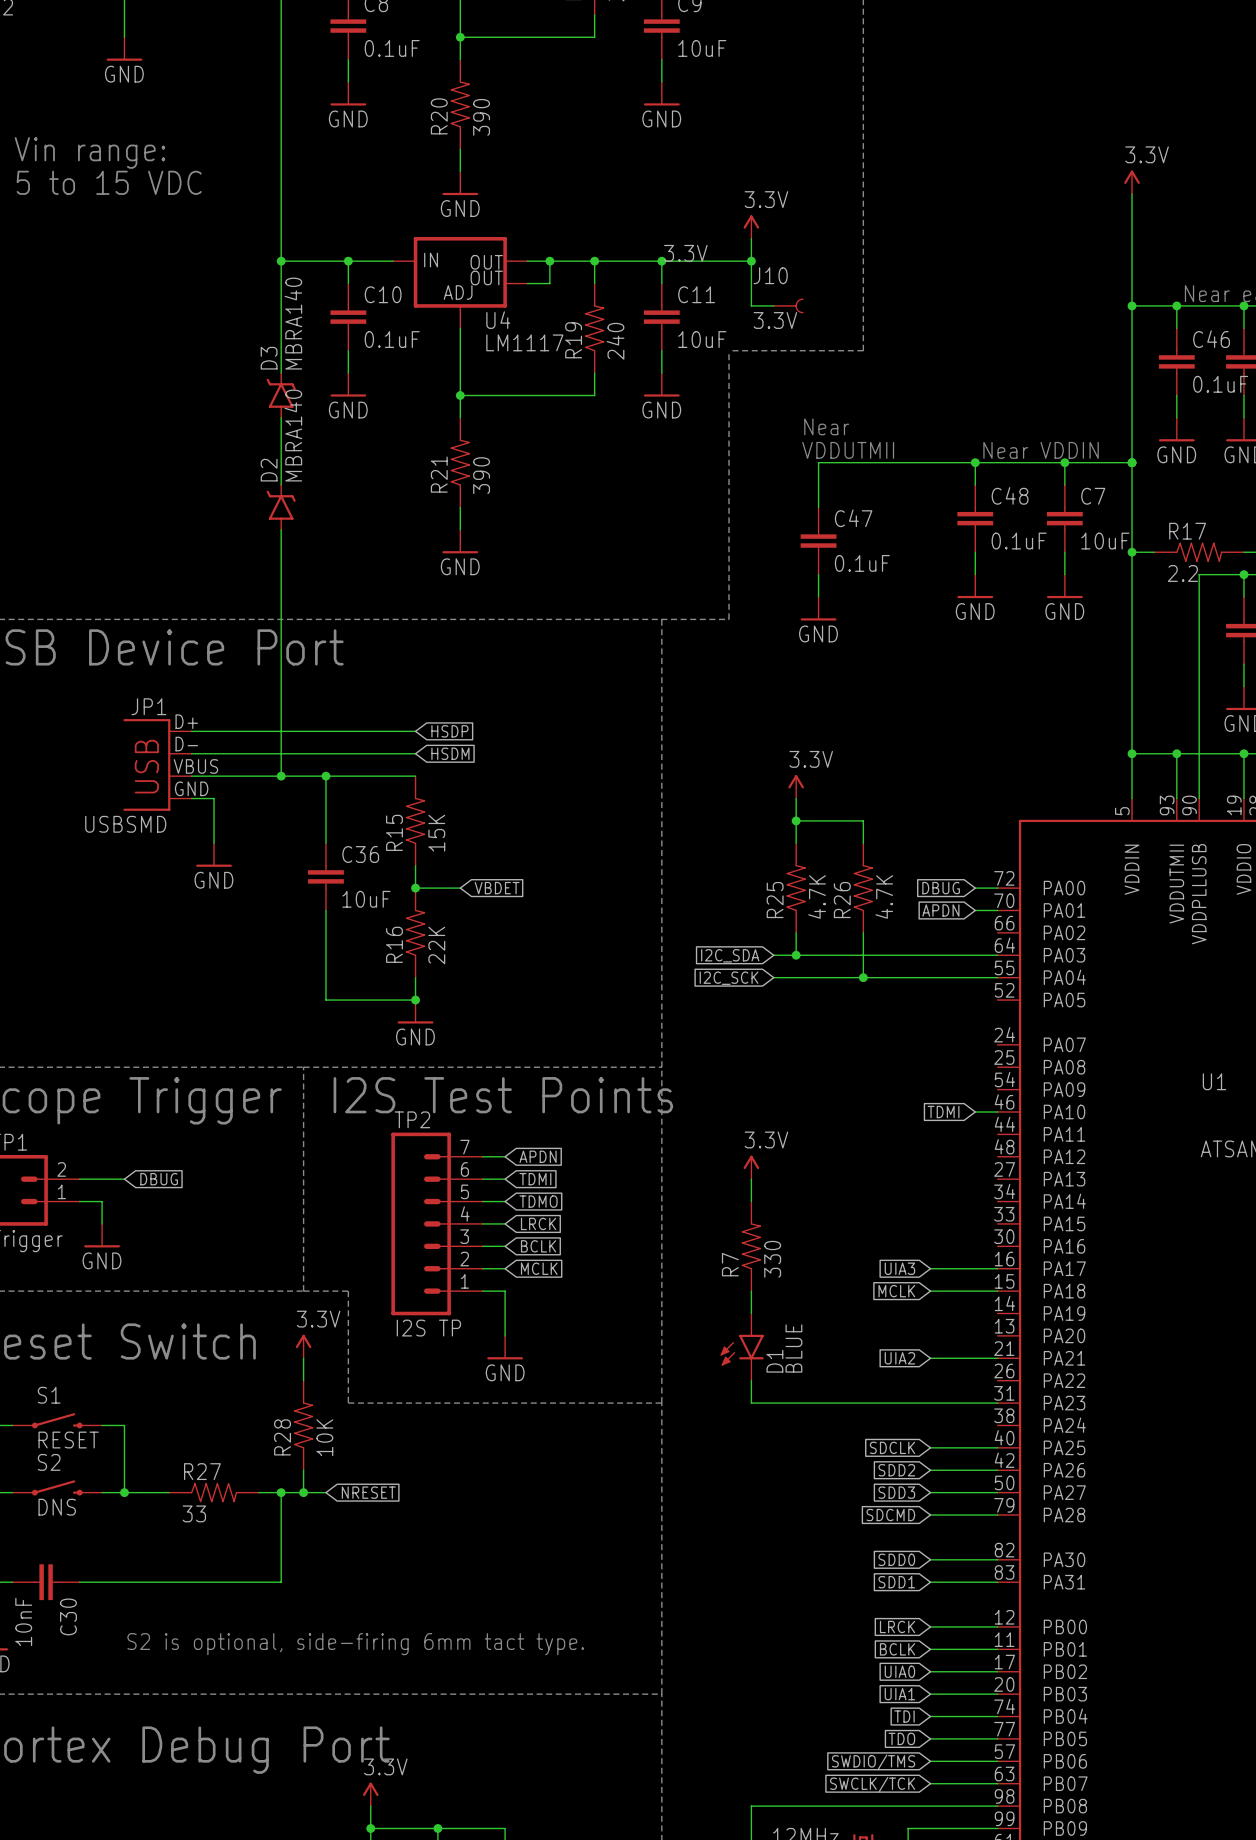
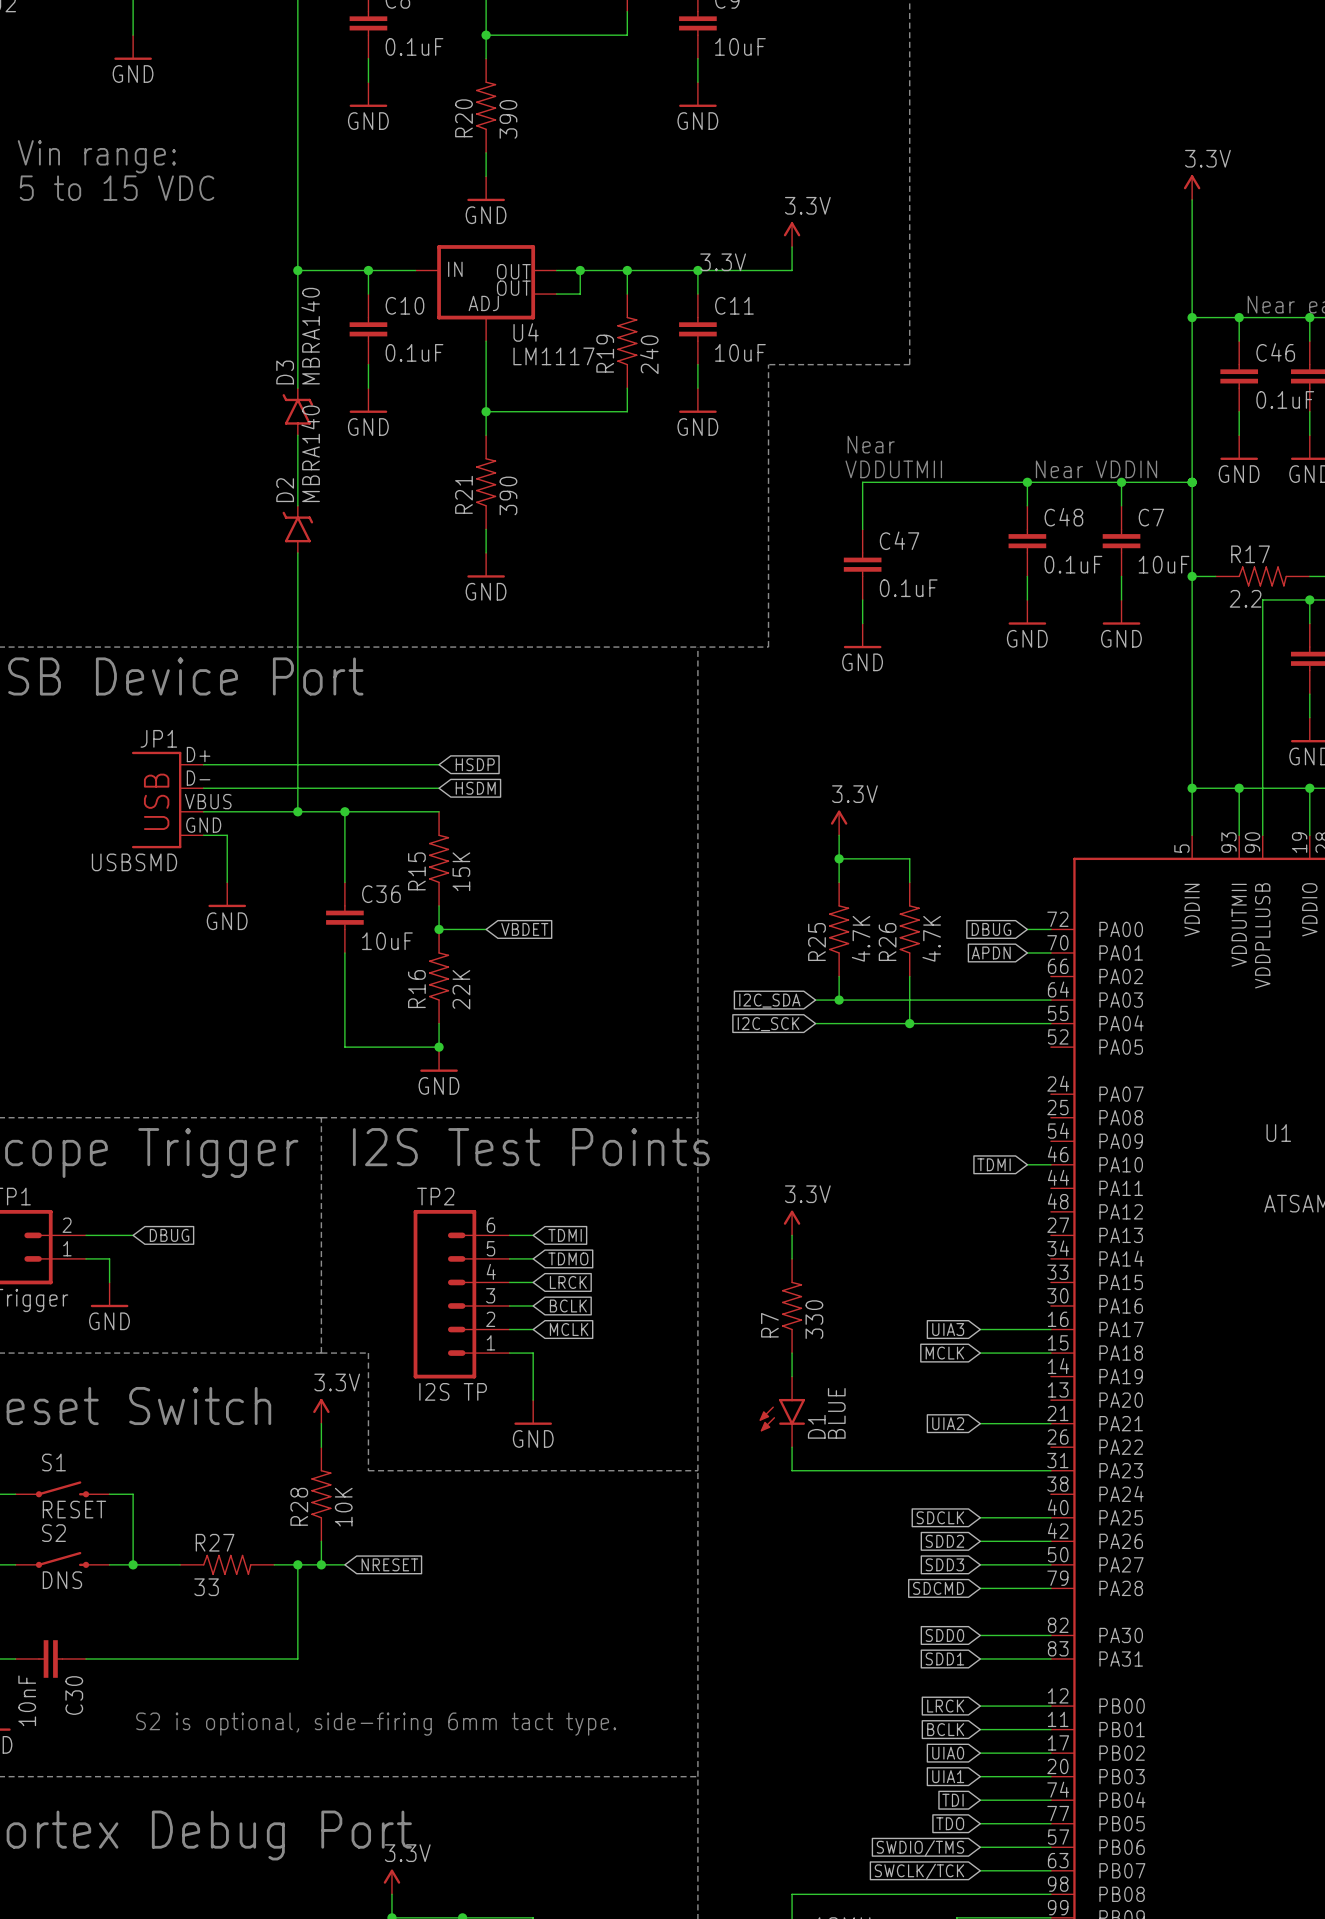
wire: (751, 261) (751, 305) (773, 305) -> none
junction: (751, 261) -> none
J10: 3.3V (788, 305) -> none
TP2 symbol: [391, 1132, 483, 1316] -> [413, 1209, 510, 1379]
wire: (482, 1156) (505, 1156) -> none
global label: APDN (538, 1156) -> none

